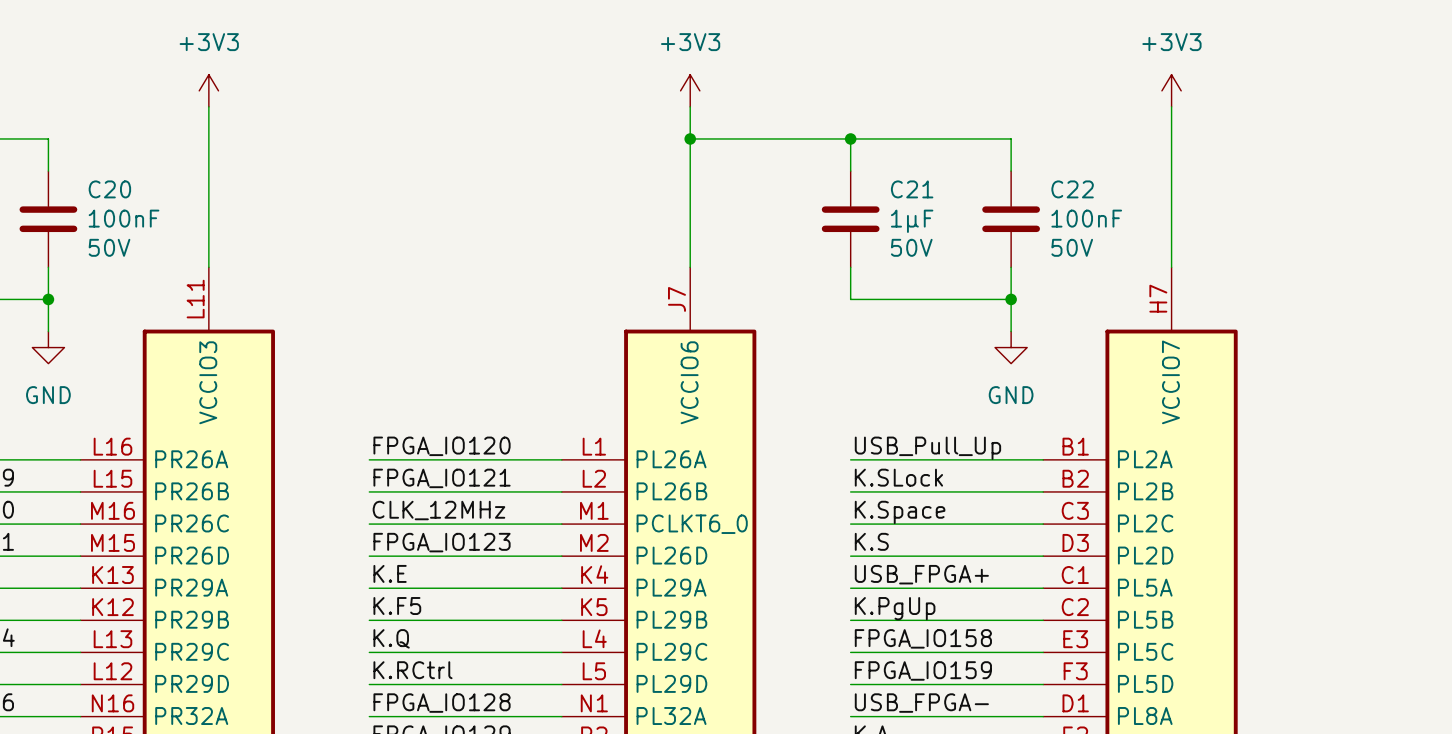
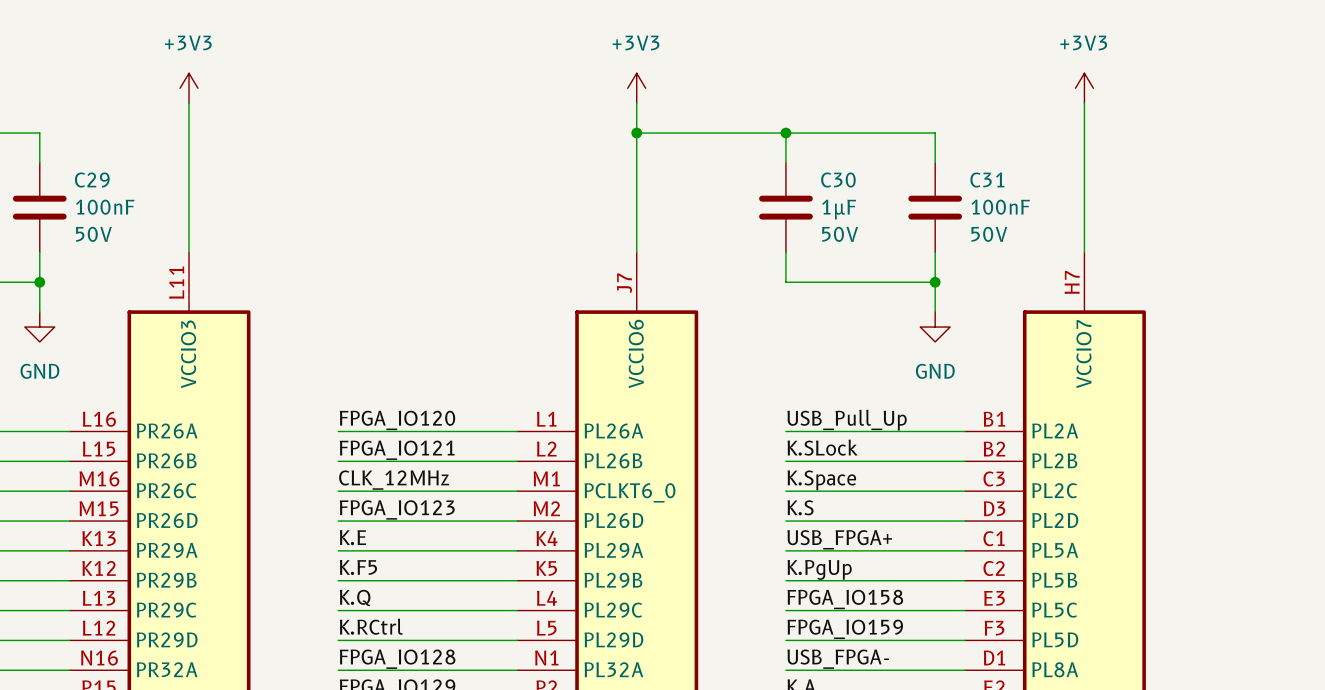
C20 name: C20 (109, 189) -> C29 (92, 180)
C21 name: C21 (912, 189) -> C30 (838, 180)
C22 name: C22 (1072, 189) -> C31 (987, 180)

